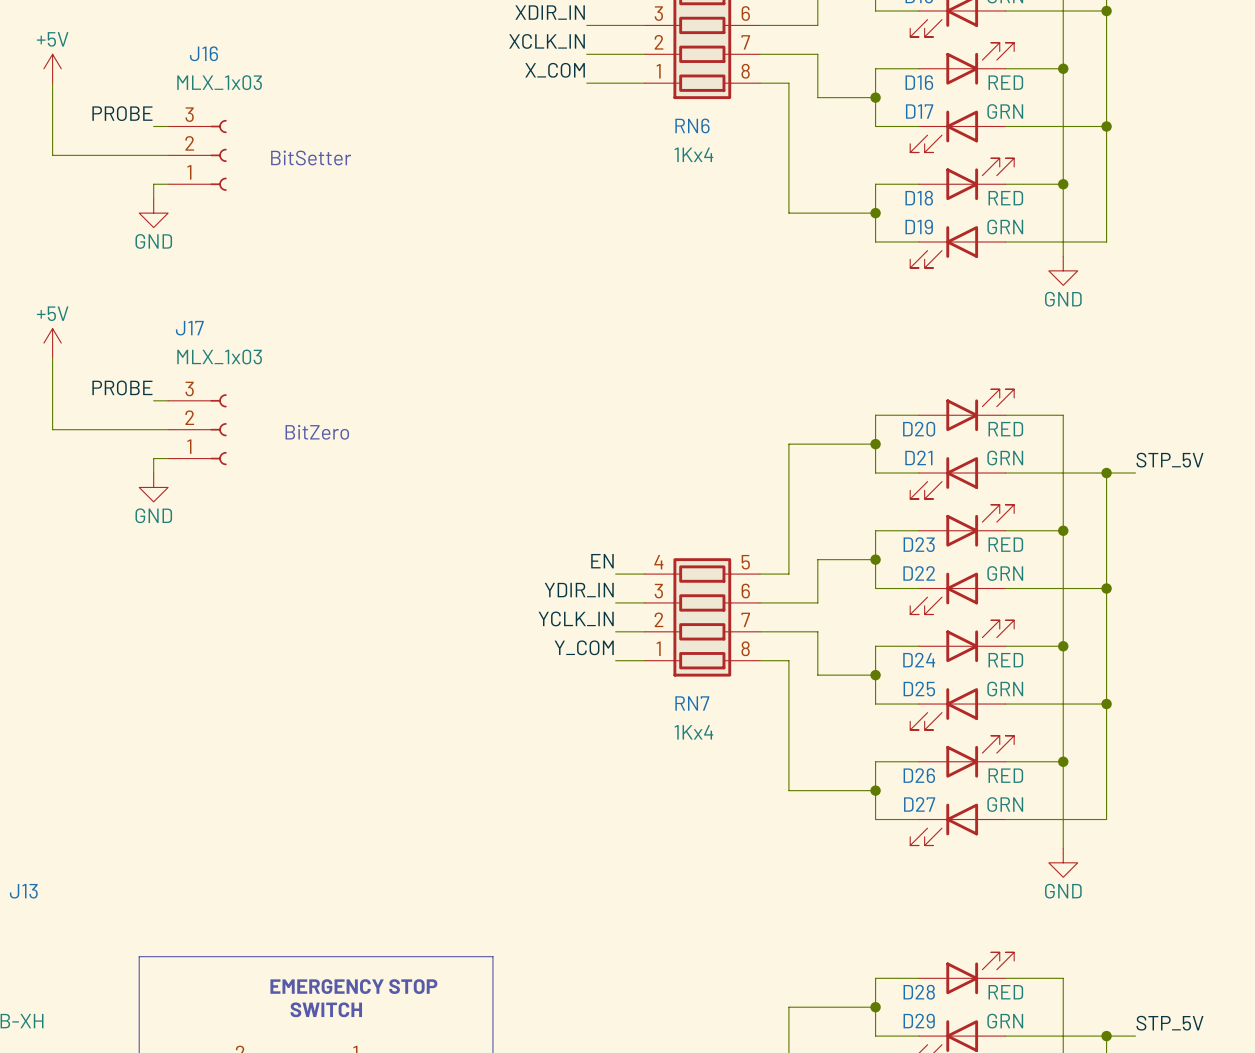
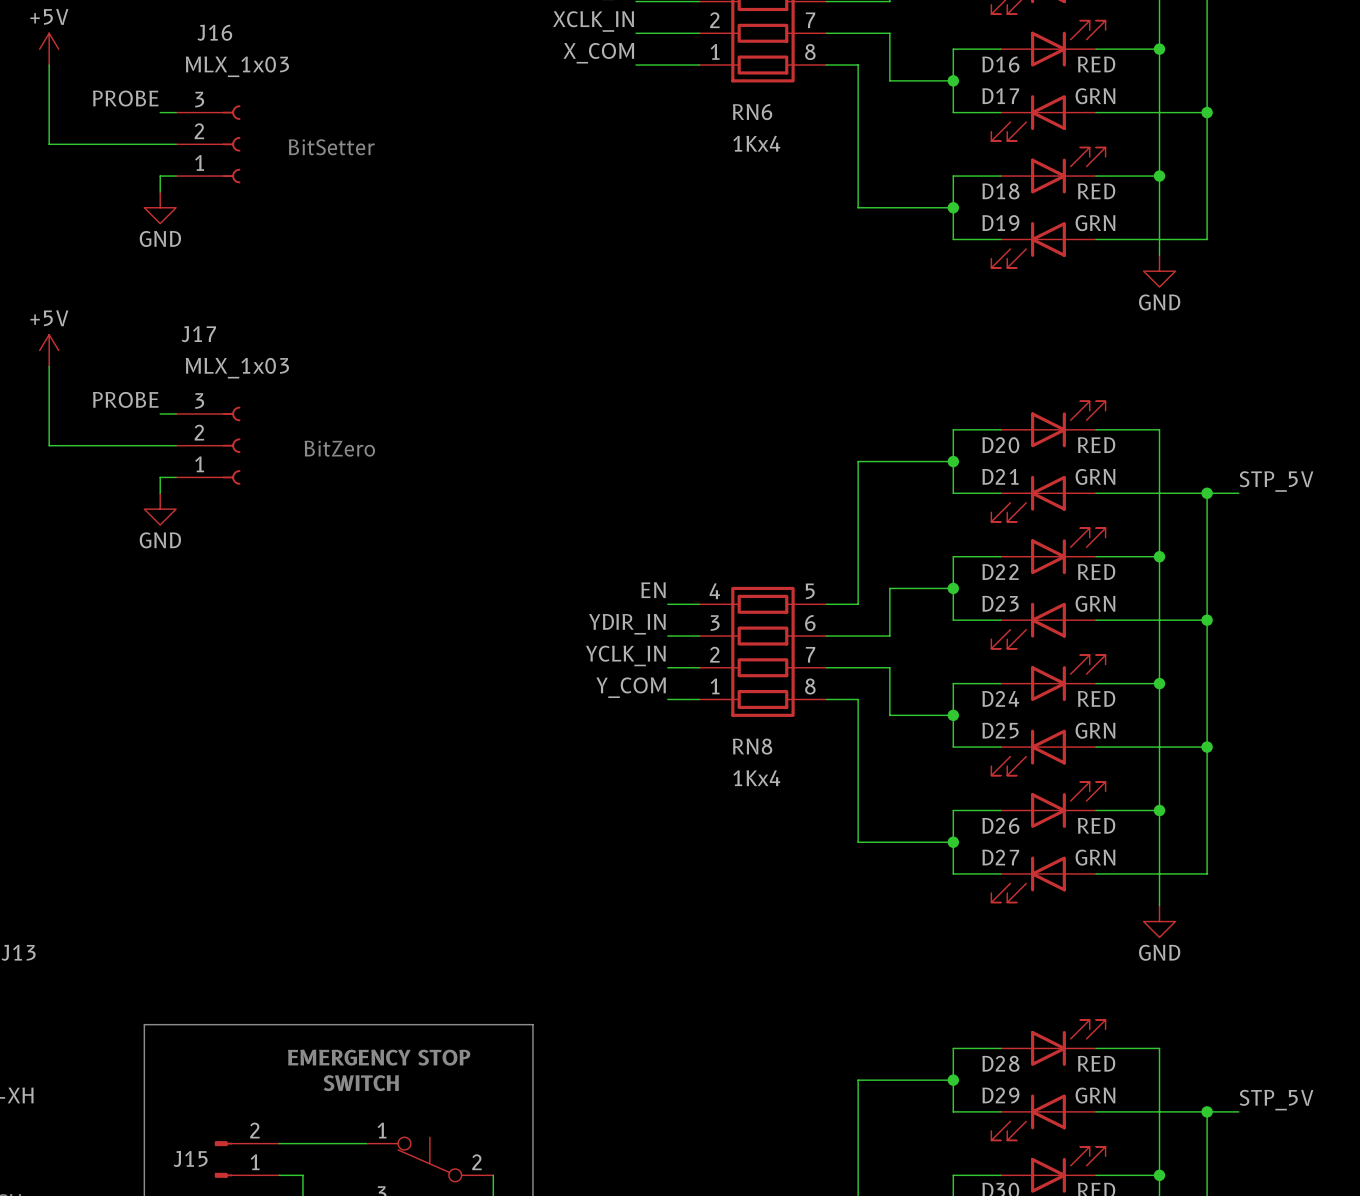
D23 name: D23 (919, 544) -> D22 (1000, 572)
D22 name: D22 (919, 573) -> D23 (1000, 603)
RN7 name: RN7 (692, 703) -> RN8 (752, 746)

